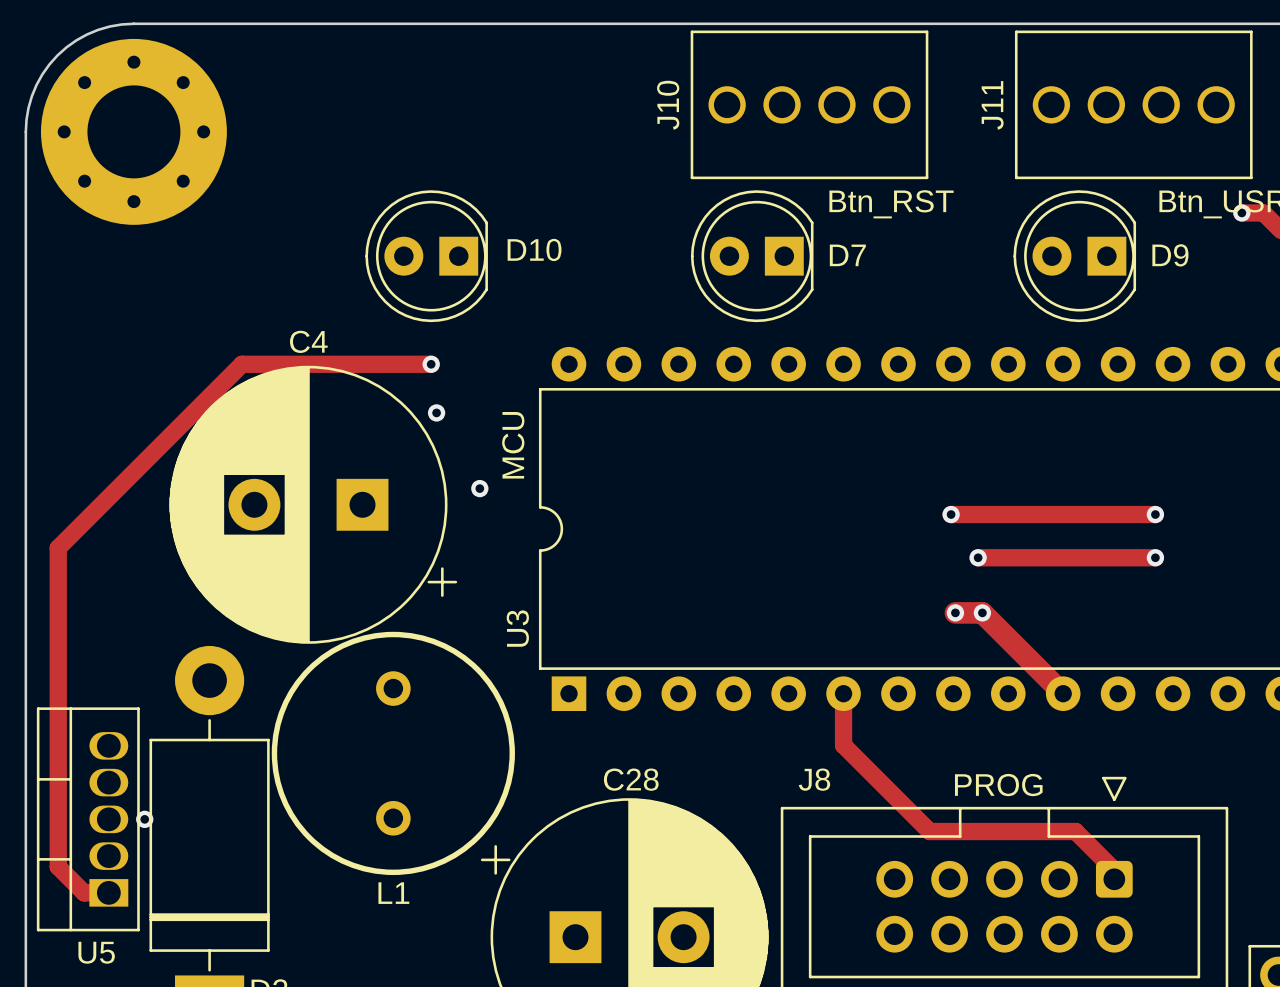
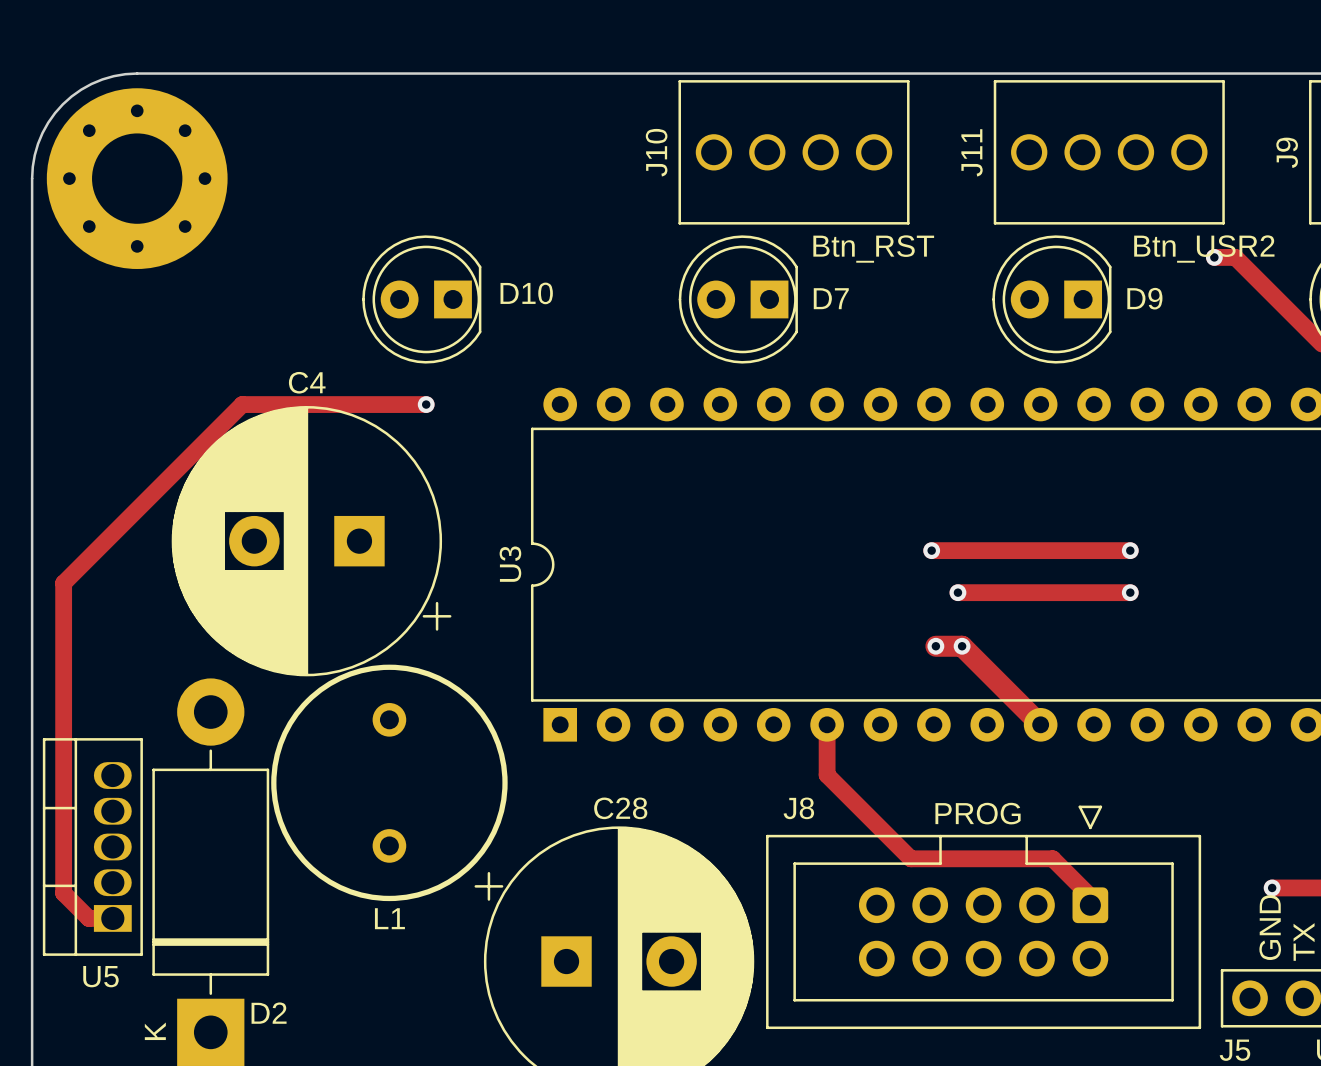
via: (436, 412) -> none
text: MCU (513, 445) -> none
via: (479, 488) -> none
U3 name position: U3 (517, 628) -> U3 (510, 564)
via: (144, 819) -> none

